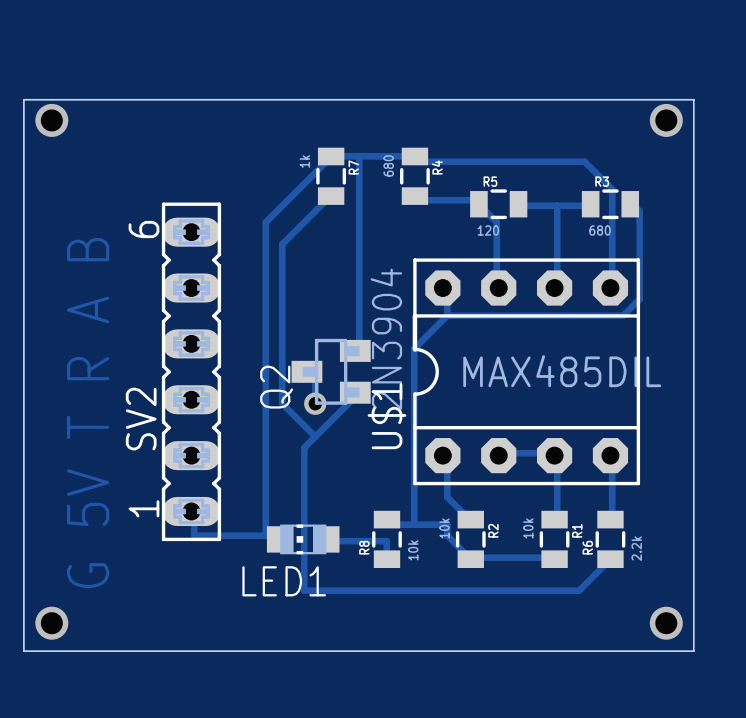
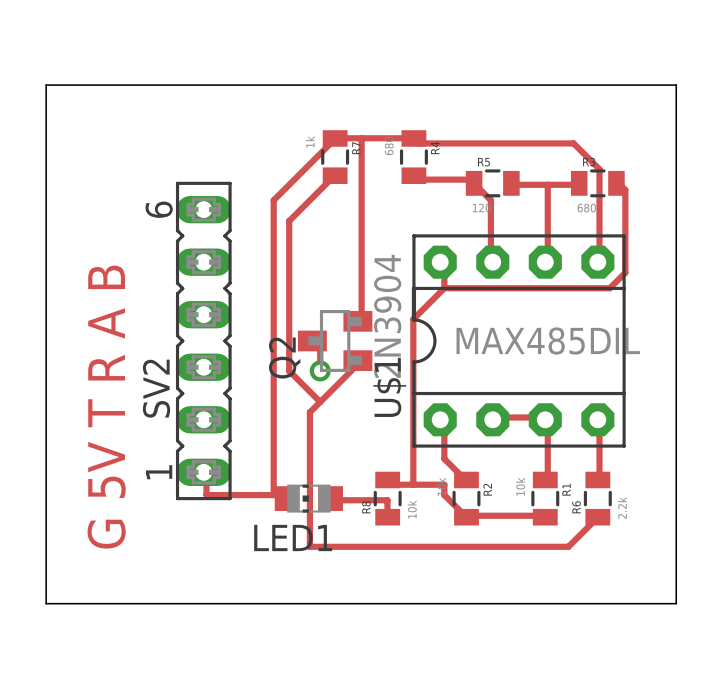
via: (51, 120) -> none
via: (666, 120) -> none
via: (51, 623) -> none
via: (666, 623) -> none

